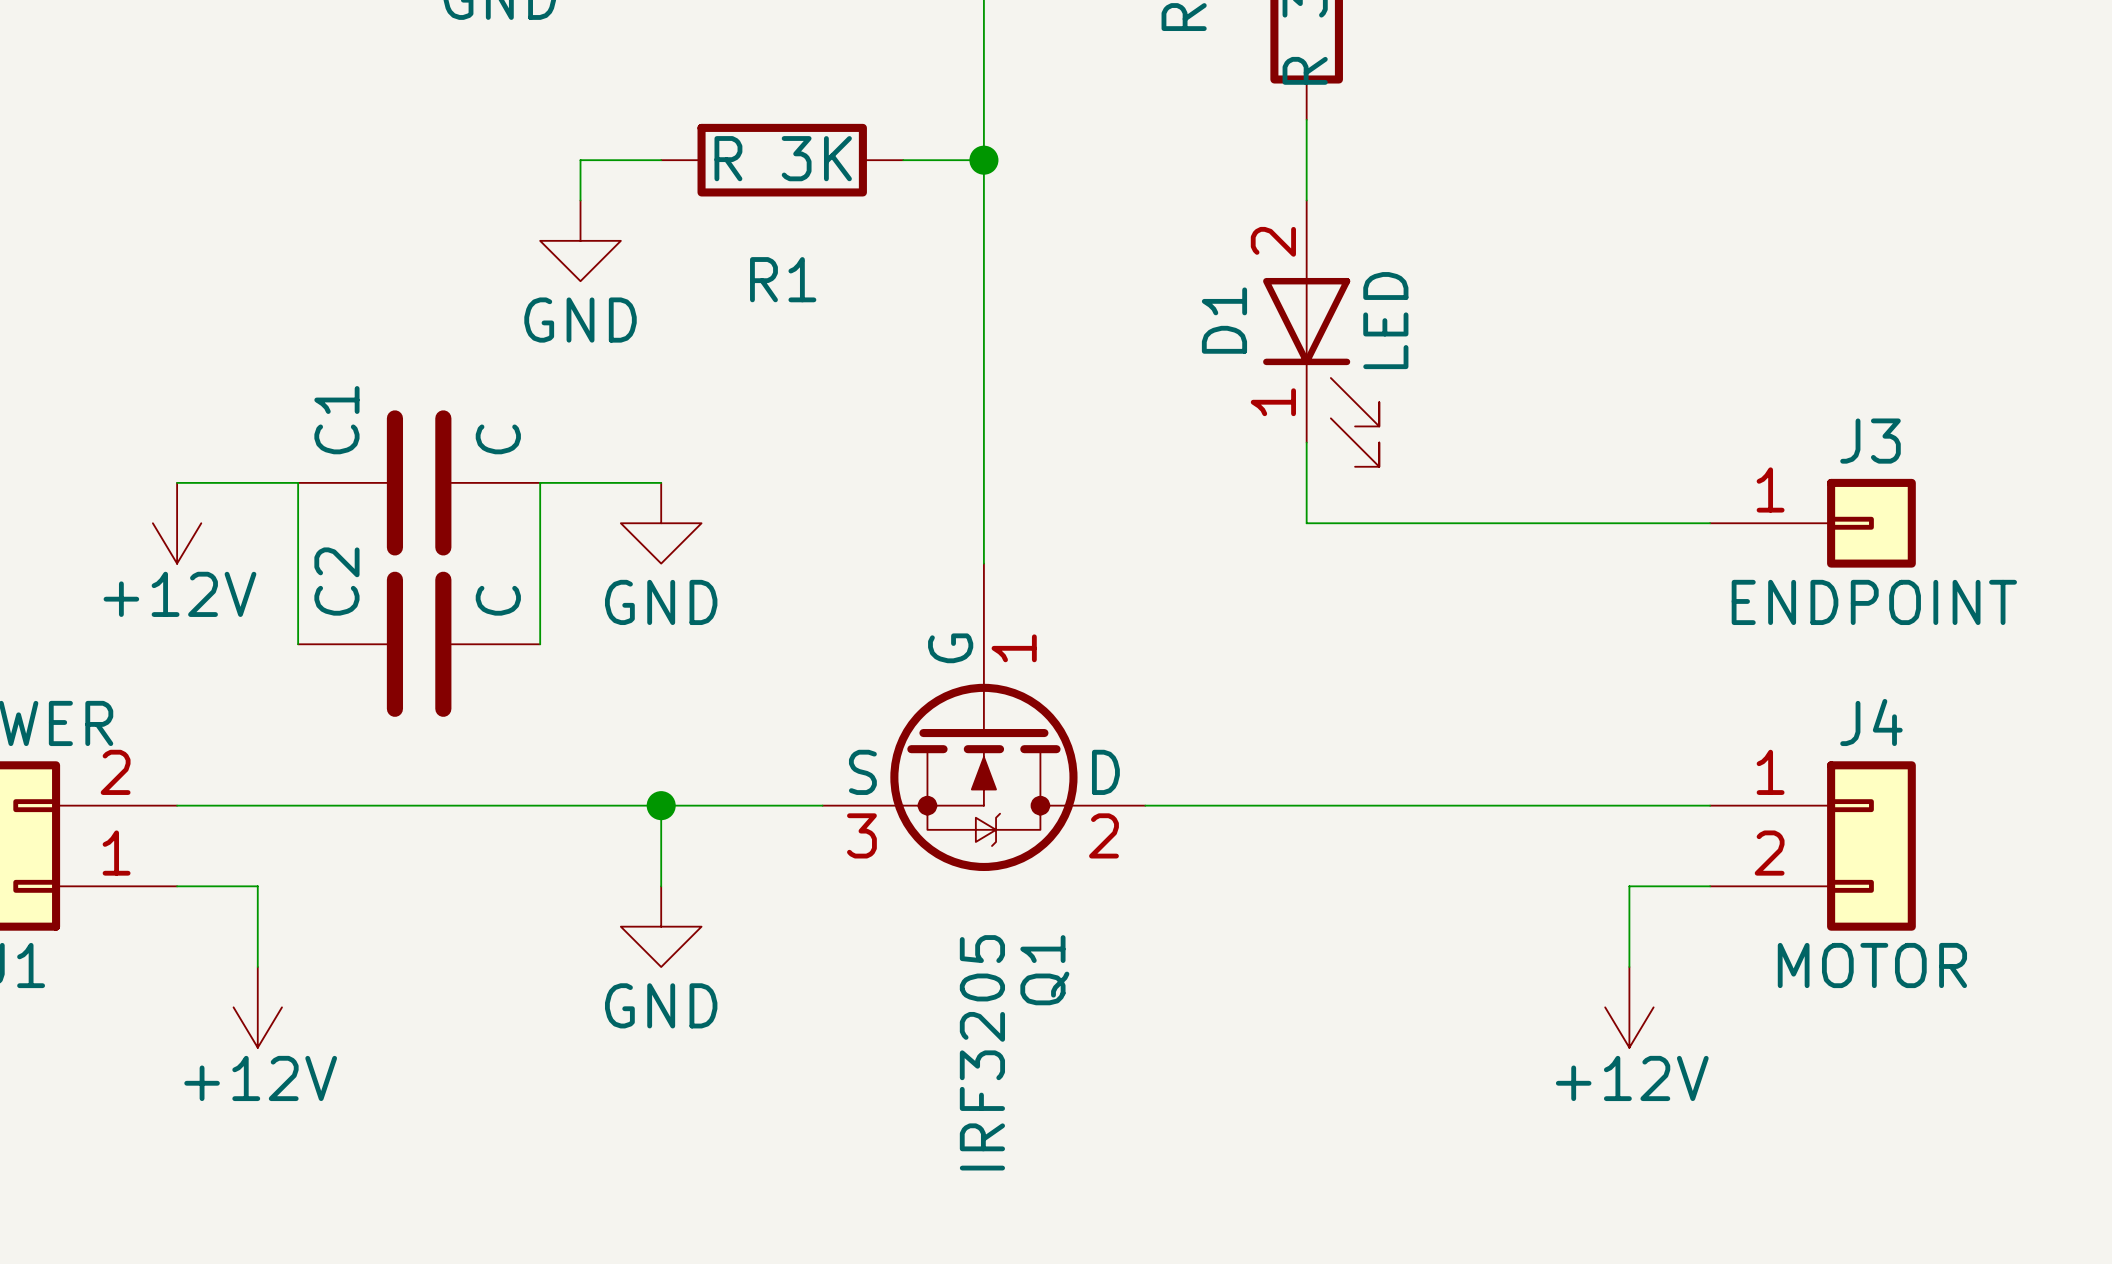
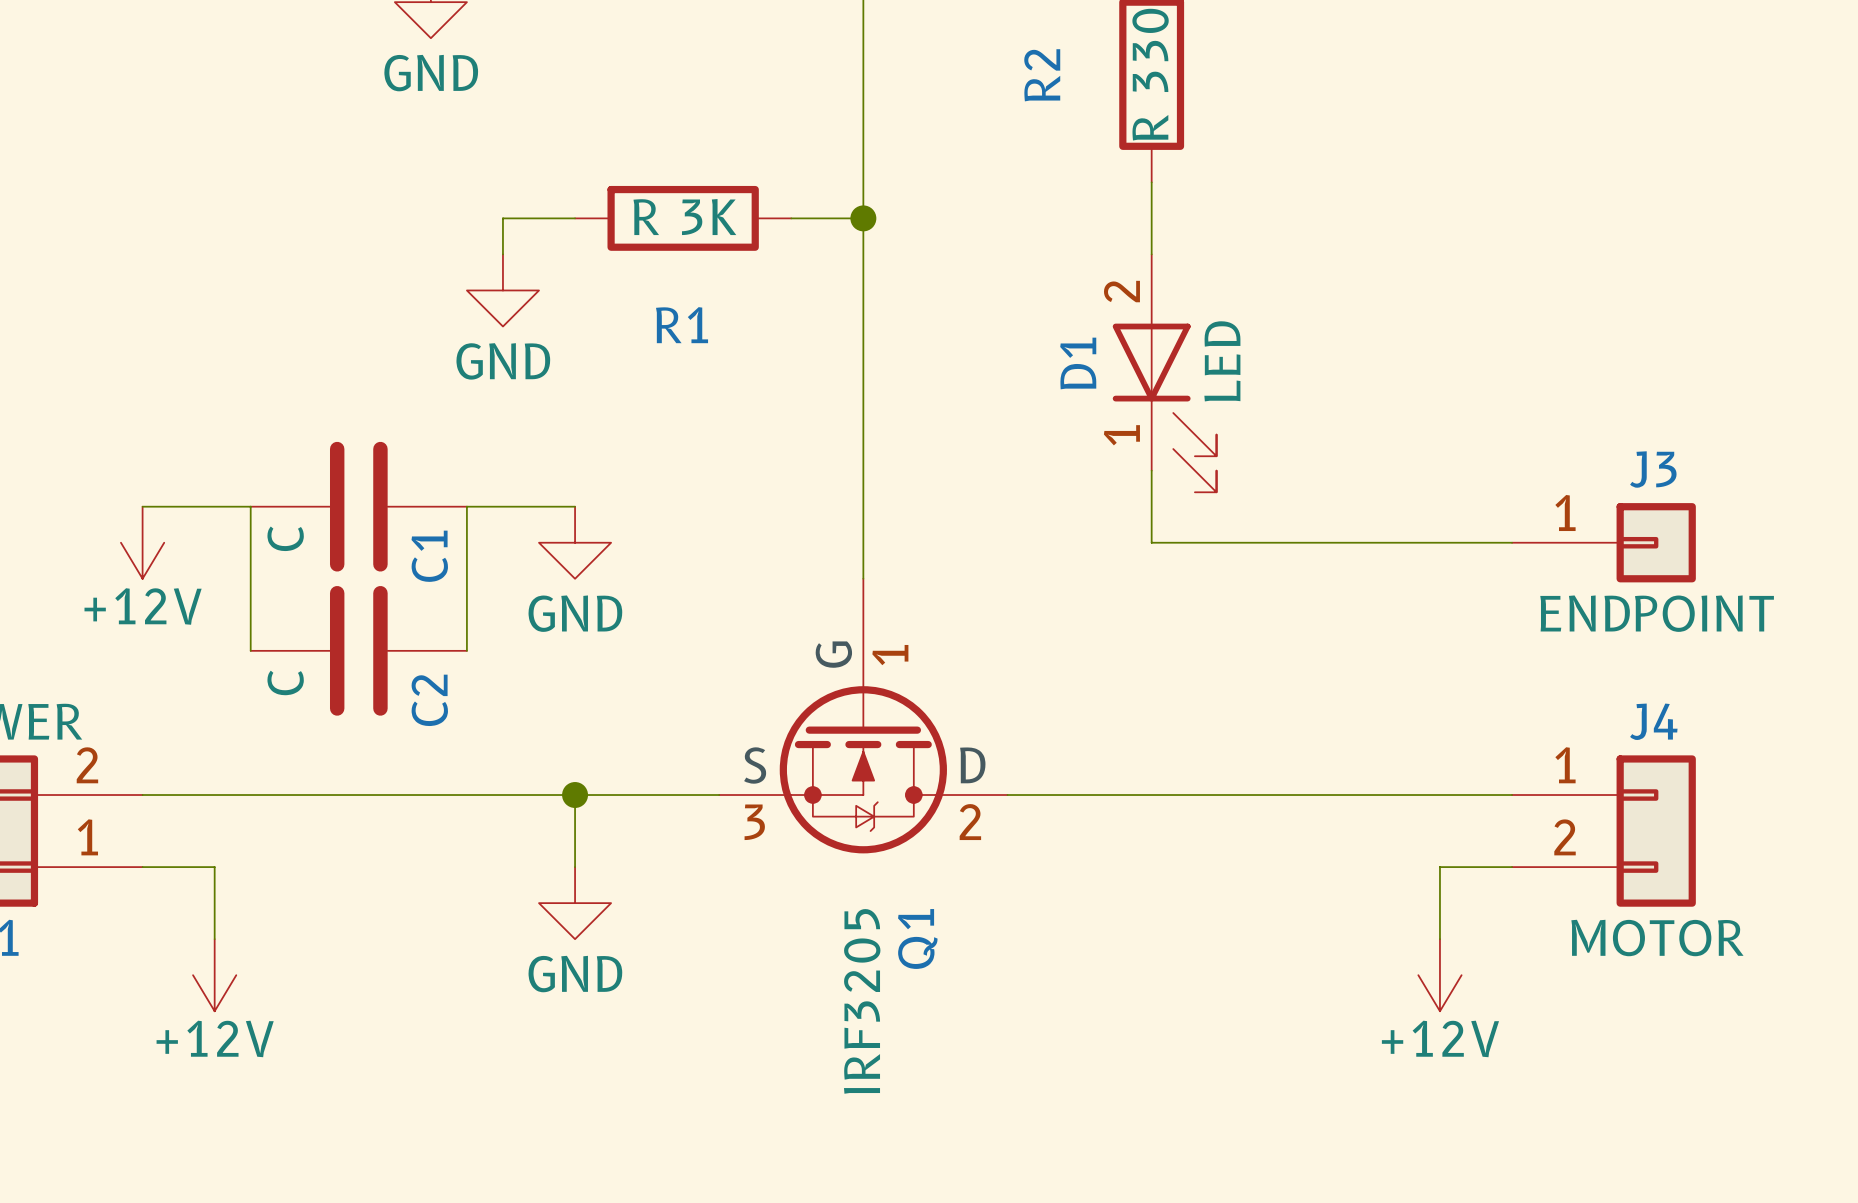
C1 name position: C1 (336, 420) -> C1 (429, 556)
C1 value position: C (498, 439) -> C (285, 538)
C2 name position: C2 (336, 581) -> C2 (429, 700)
C2 value position: C (498, 600) -> C (285, 682)

